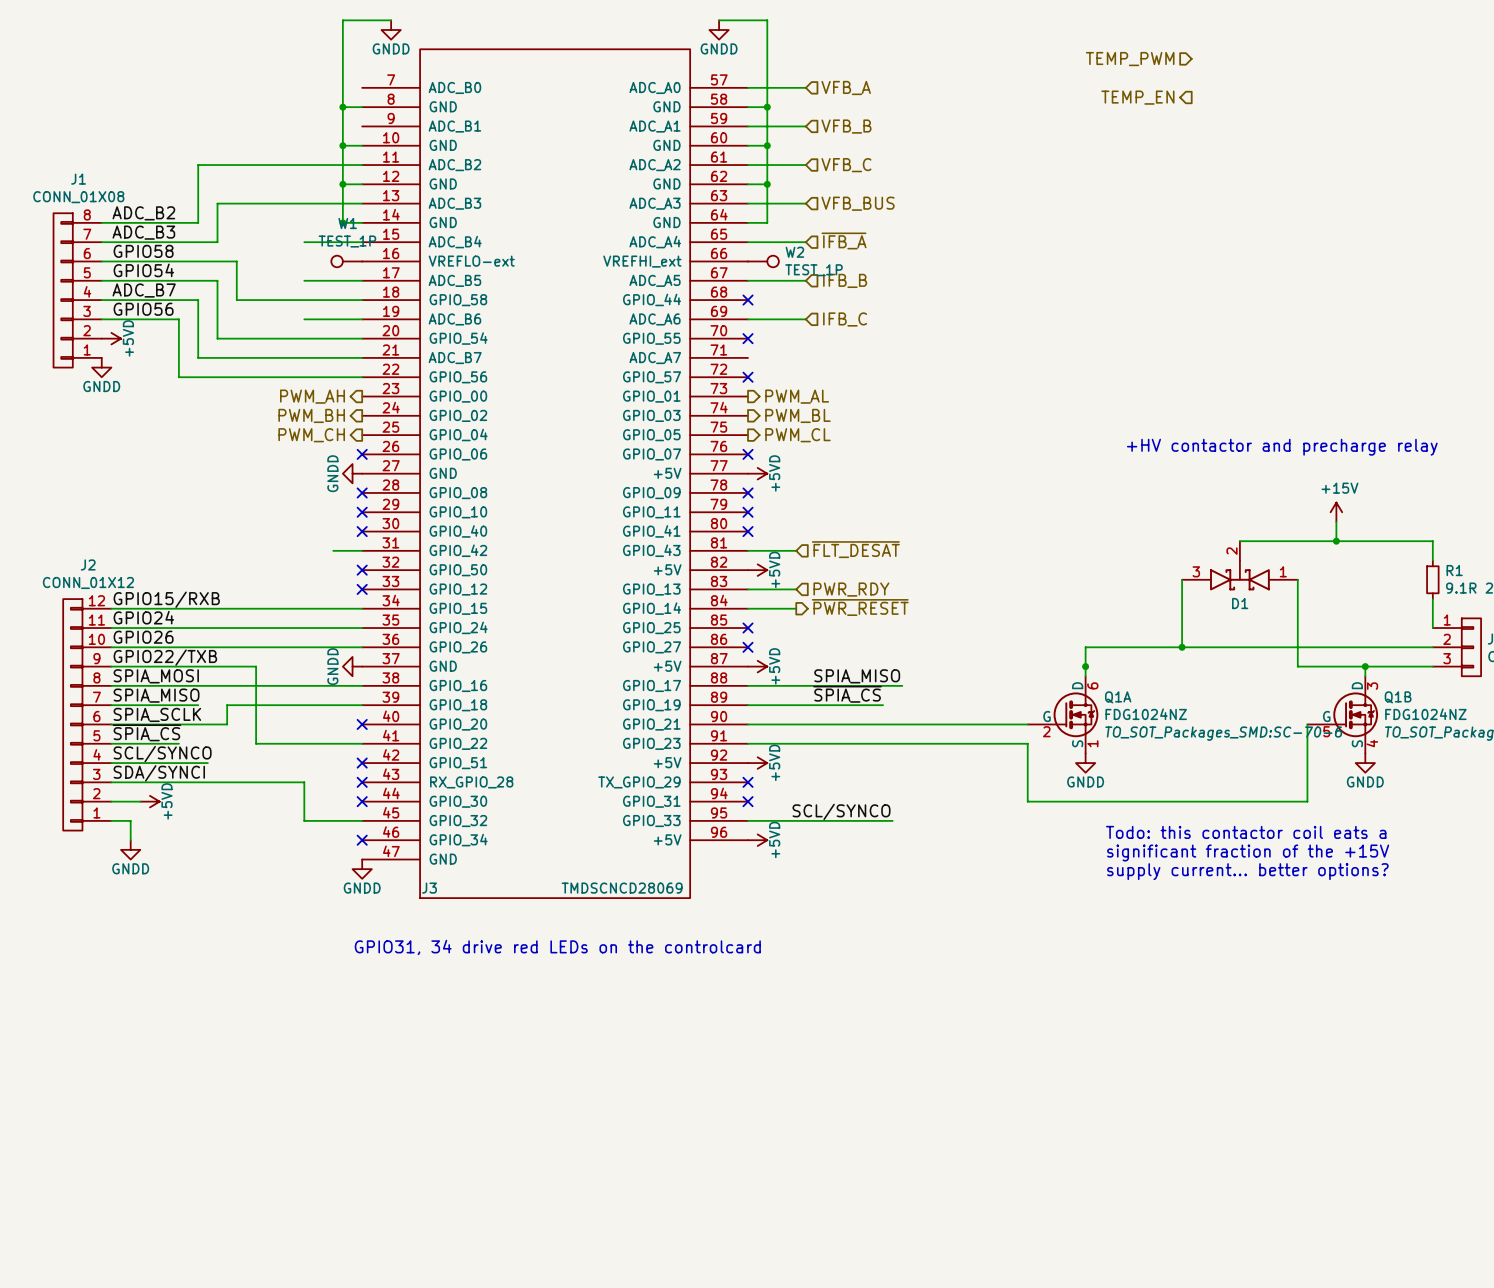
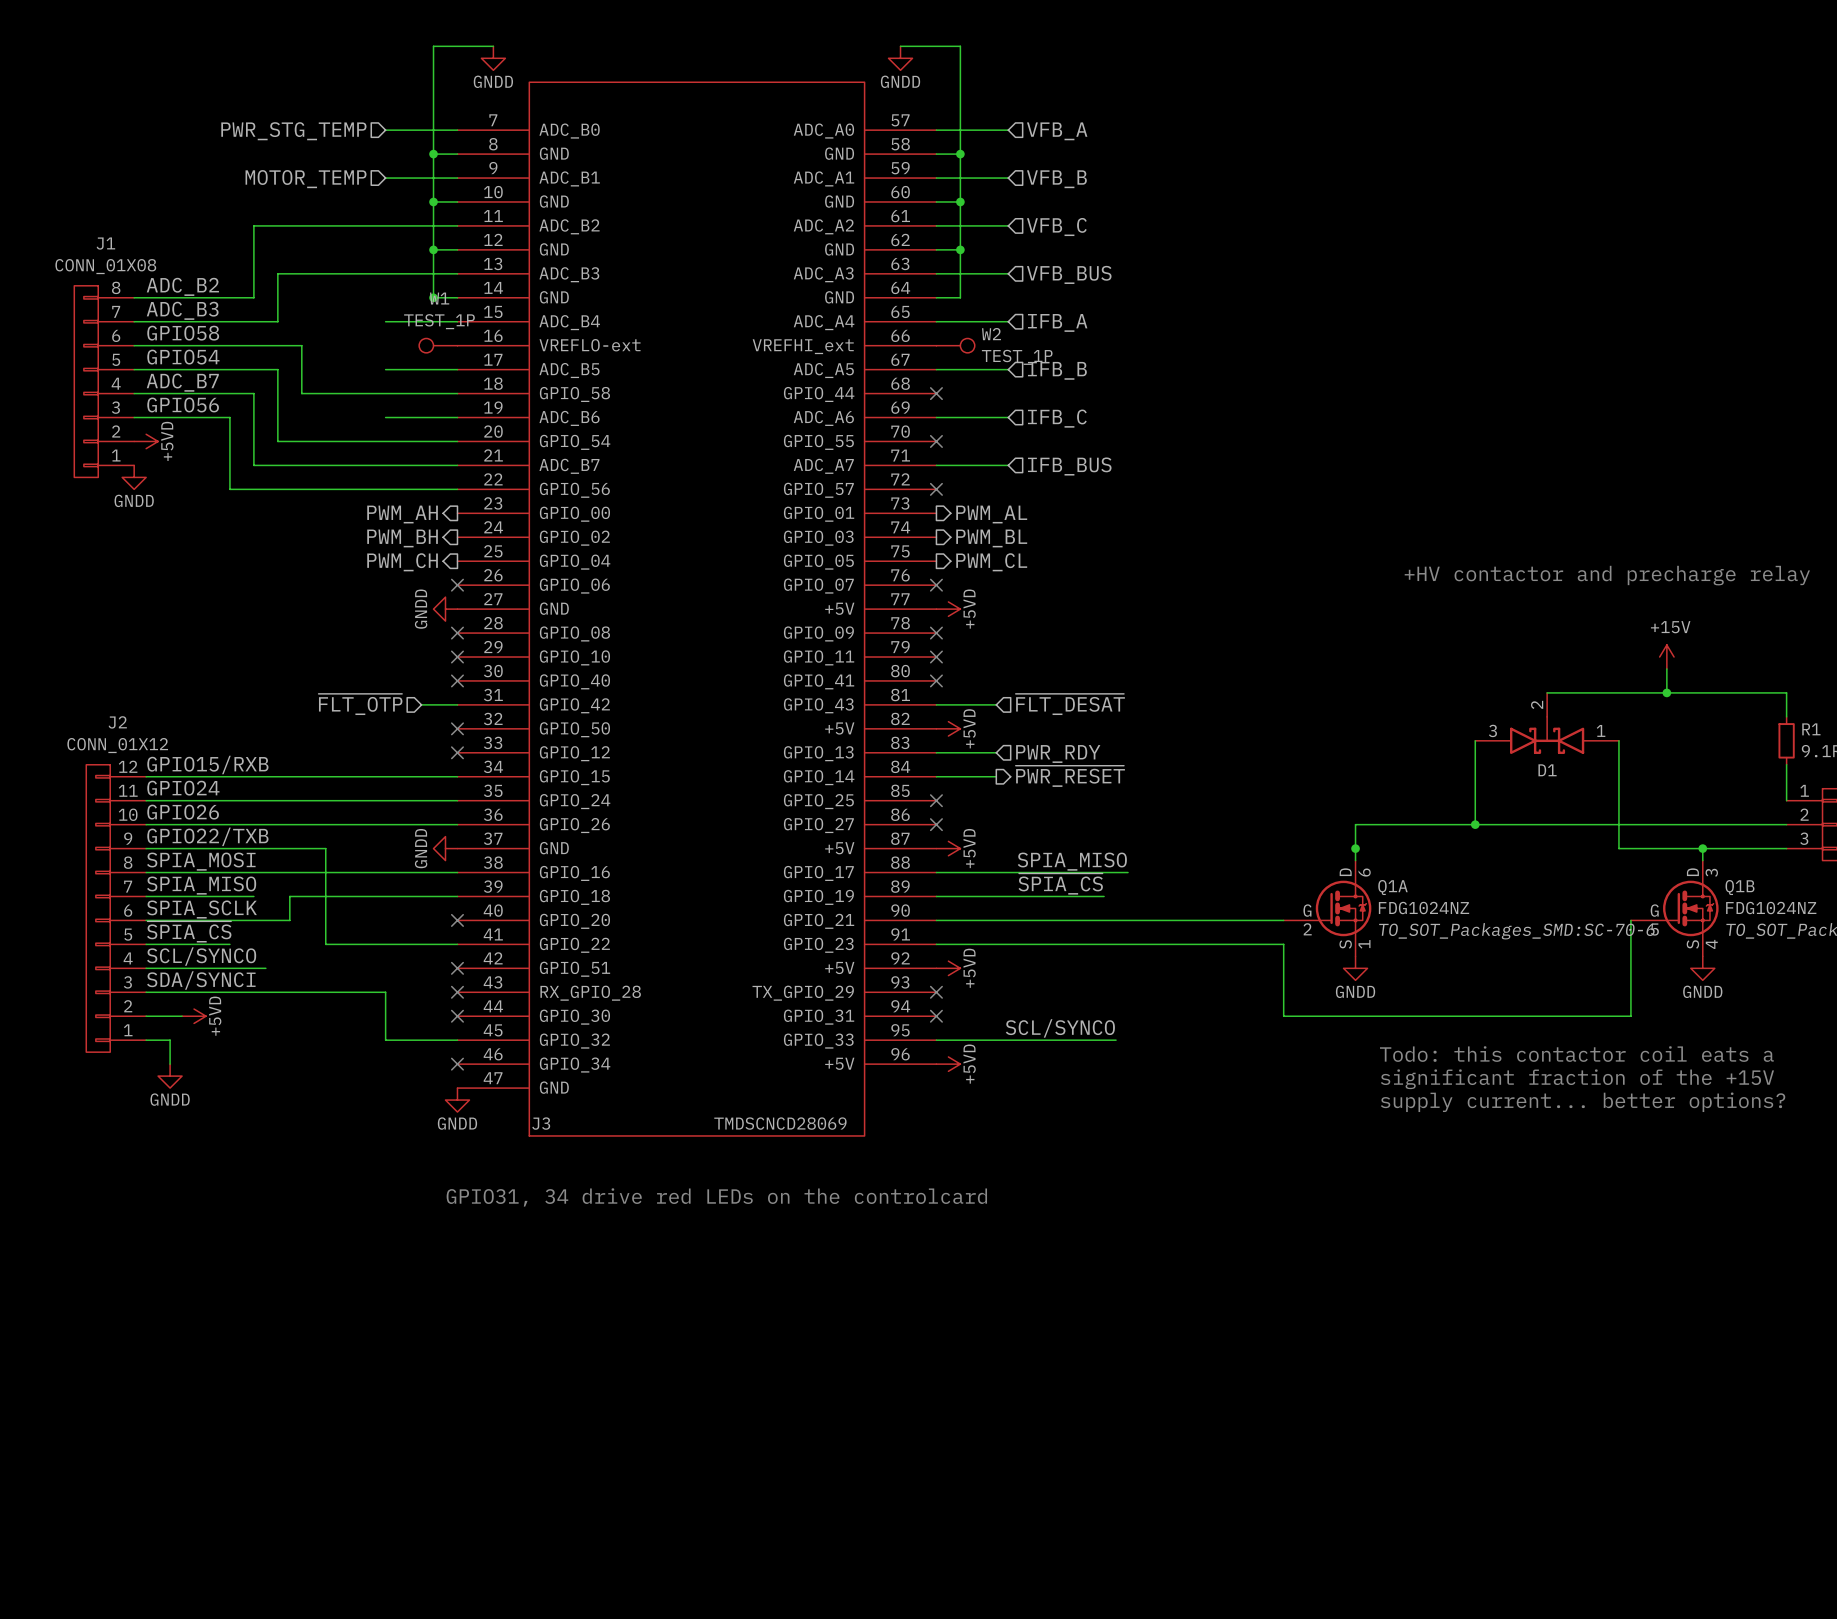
hierarchical label: TEMP_PWM (1130, 59) -> none
hierarchical label: none -> PWR_STG_TEMP (293, 131)
wire: none -> (385, 130) (457, 130)
hierarchical label: TEMP_EN (1137, 97) -> none
hierarchical label: none -> MOTOR_TEMP (306, 179)
wire: none -> (385, 178) (457, 178)
hierarchical label: ~{IFB_A} (844, 240) -> IFB_A (1057, 322)
wire: none -> (936, 465) (1008, 465)
hierarchical label: none -> IFB_BUS (1069, 466)
hierarchical label: none -> ~{FLT_OTP} (360, 704)

